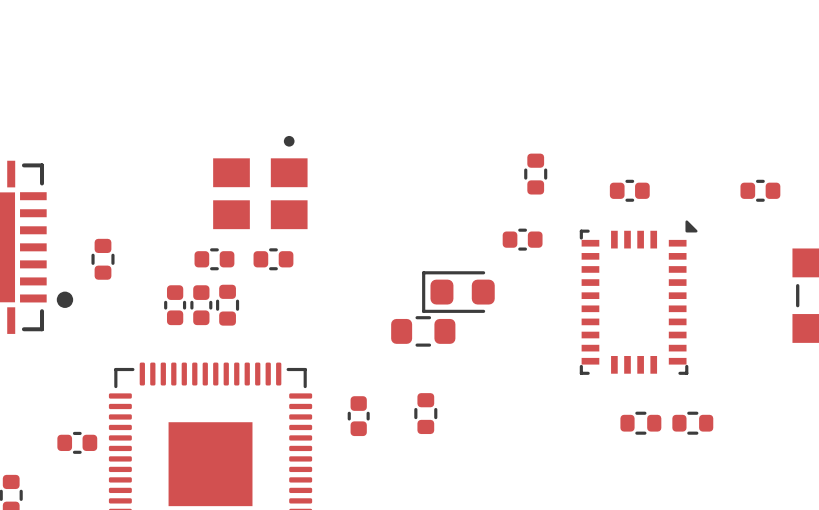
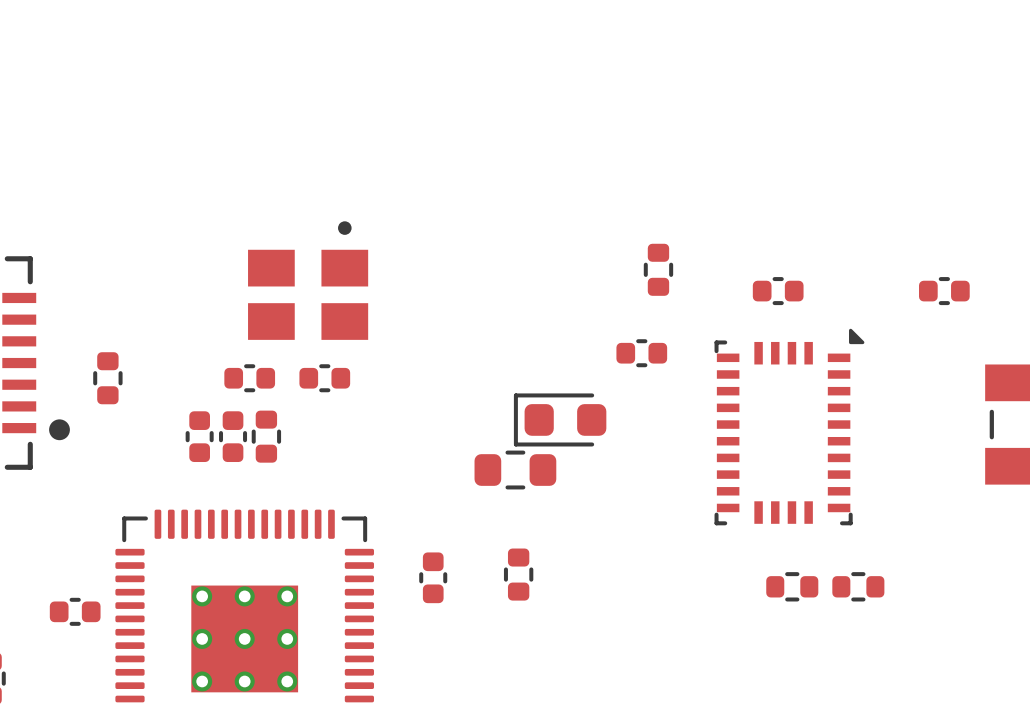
part: none -> (202, 596)
part: none -> (244, 596)
part: none -> (287, 596)
part: none -> (202, 638)
part: none -> (244, 638)
part: none -> (287, 638)
part: none -> (202, 681)
part: none -> (244, 681)
part: none -> (287, 681)

